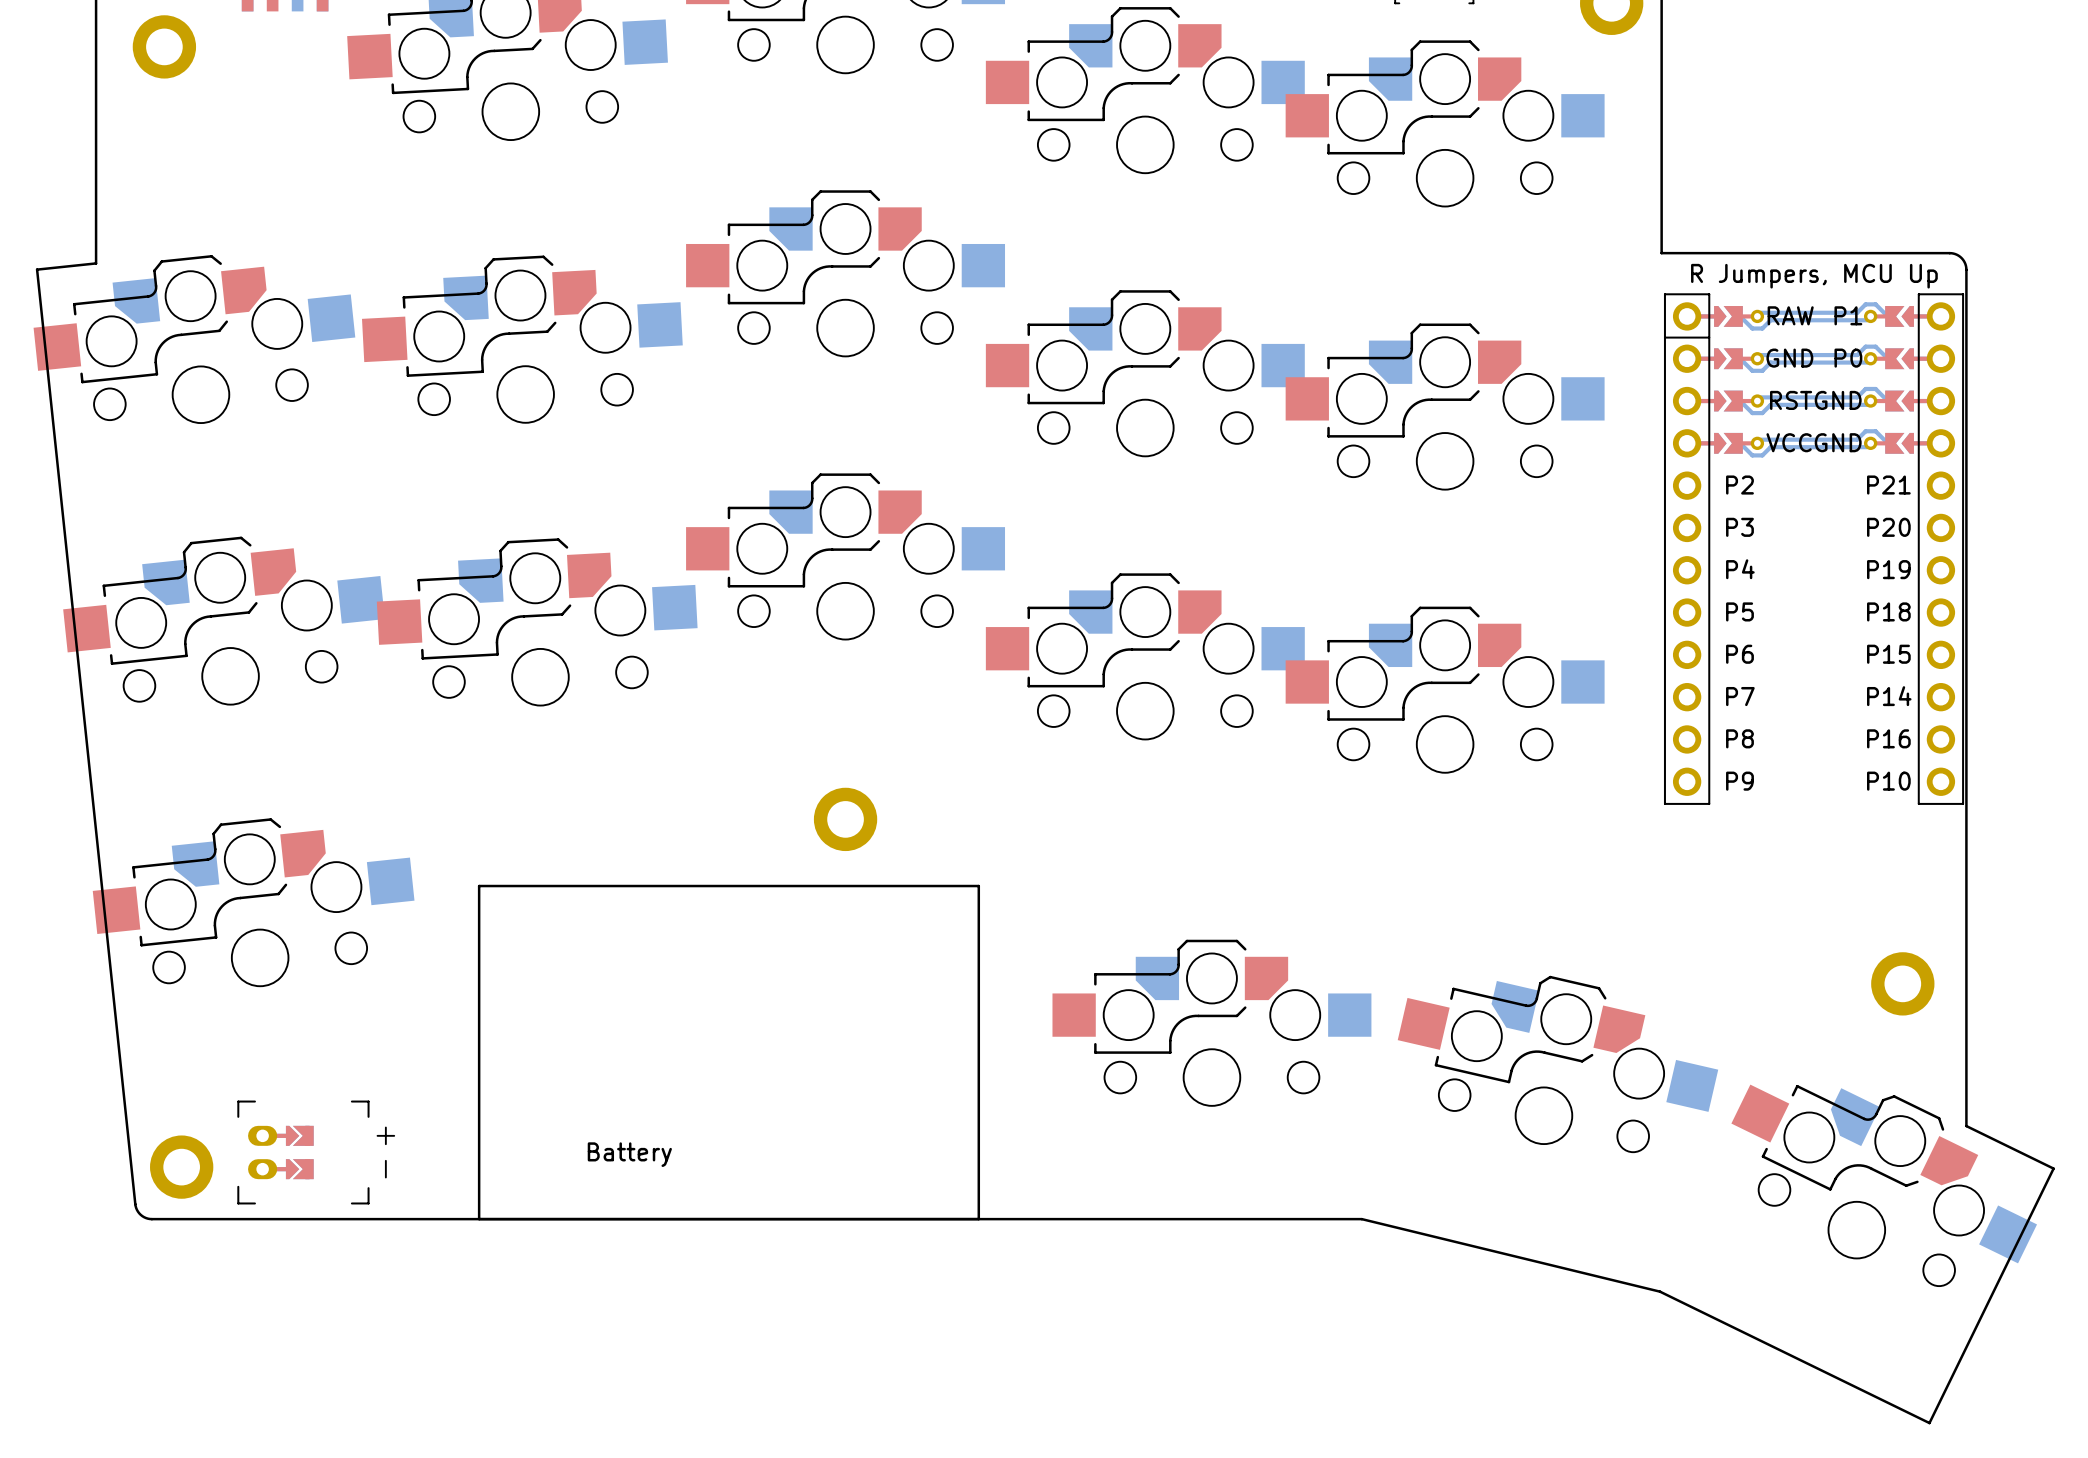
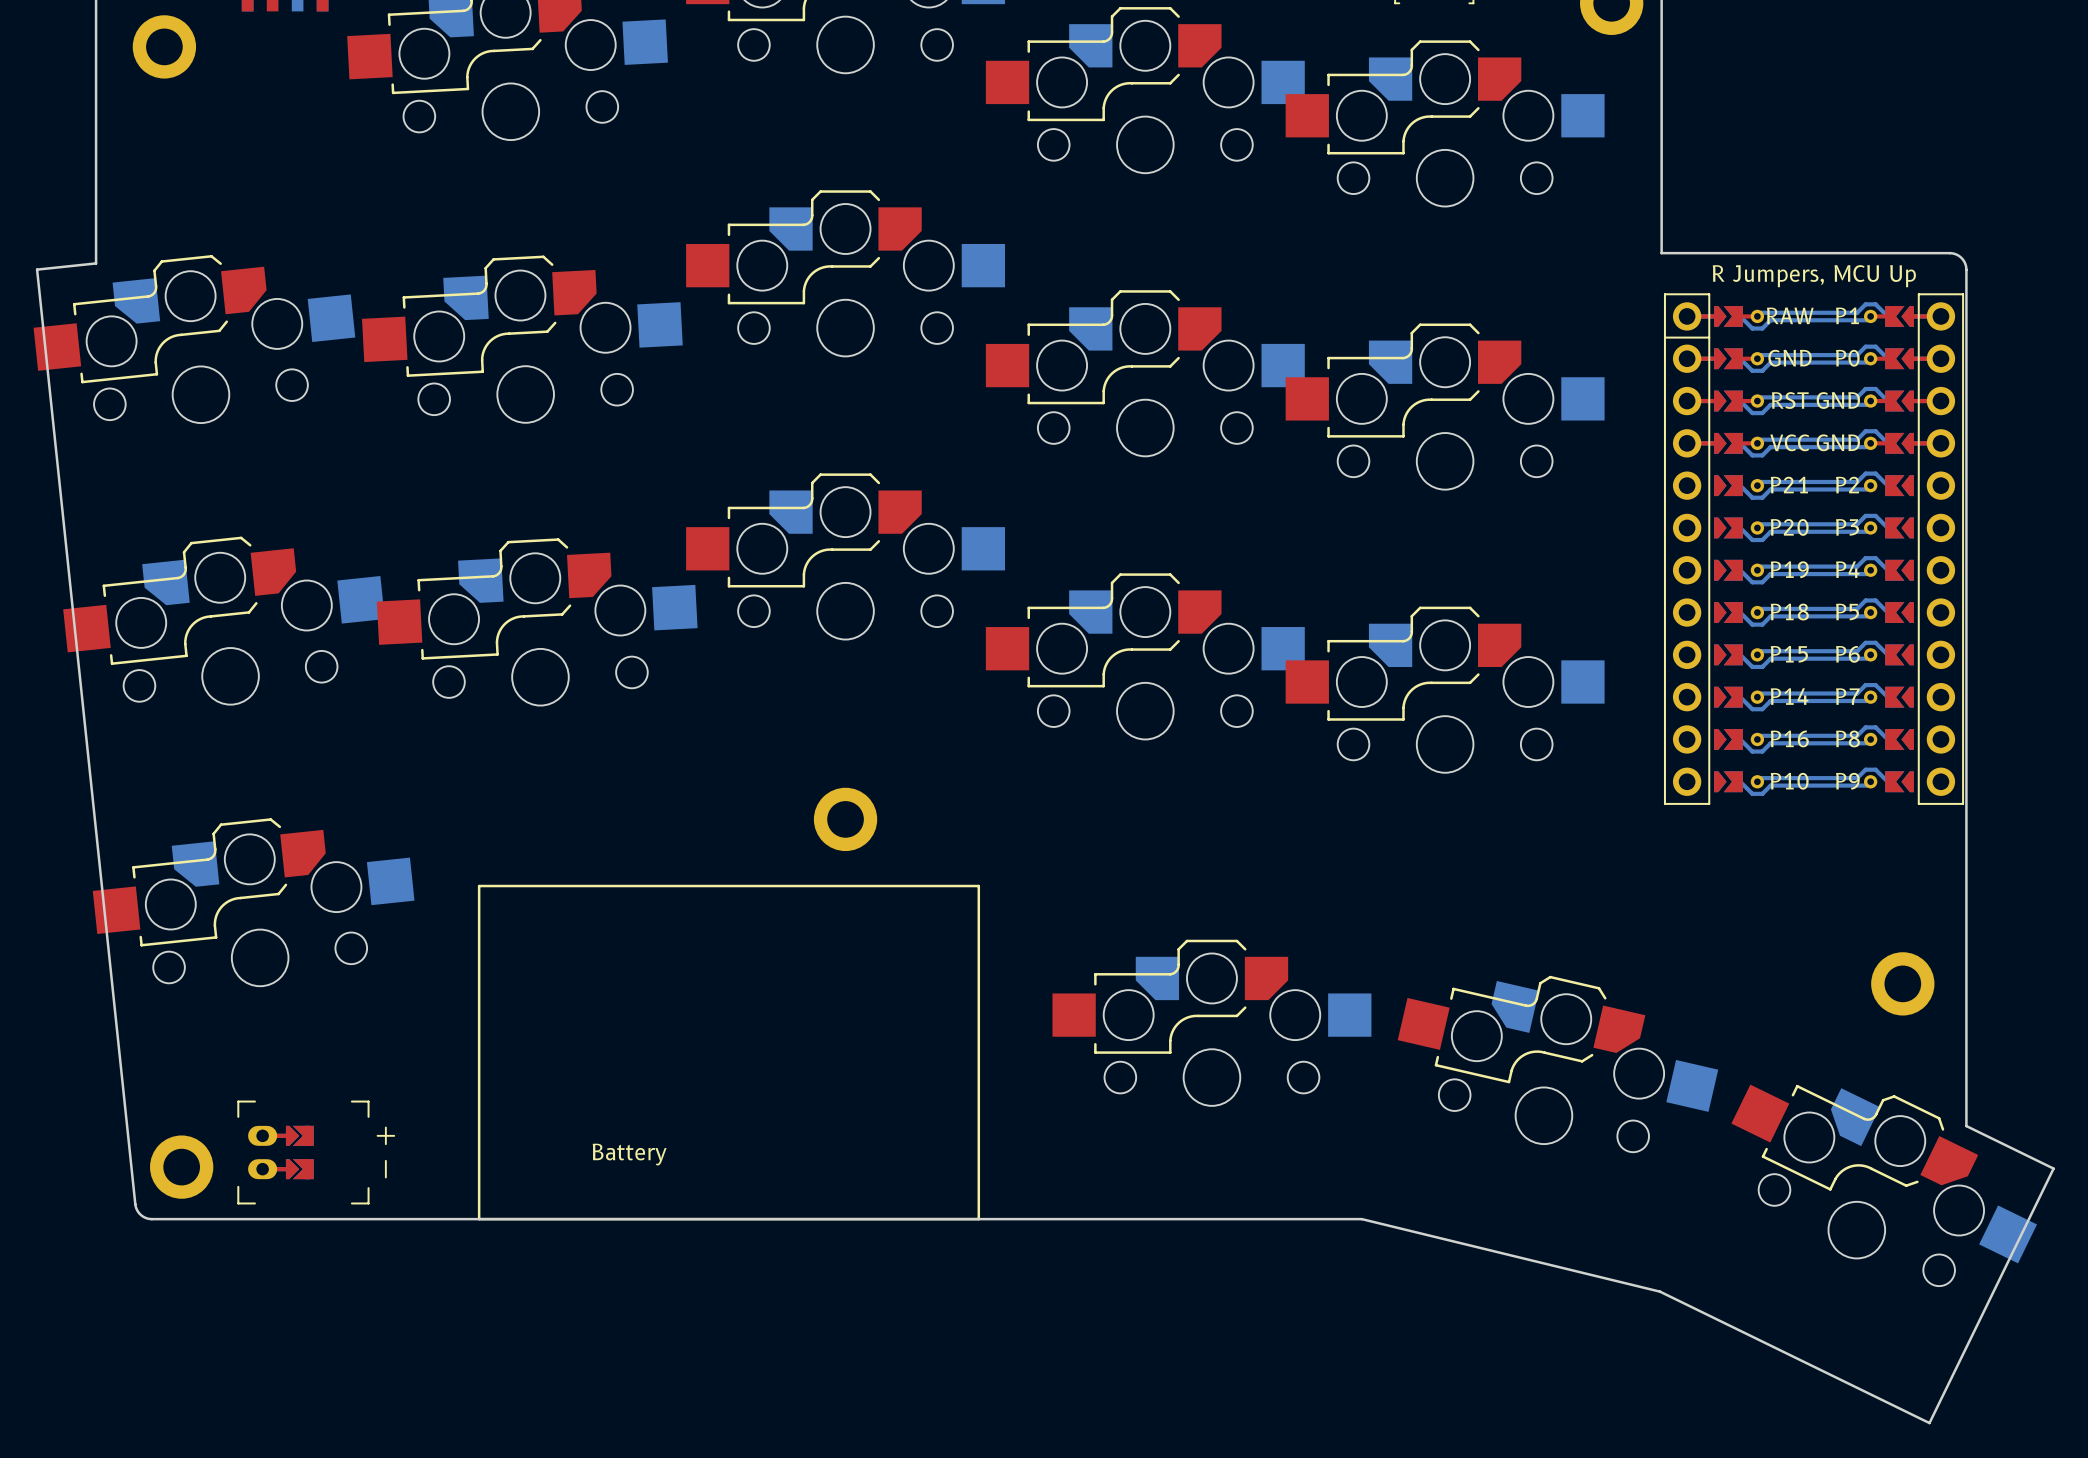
part footprint: [1663, 293, 1965, 805] -> [1663, 293, 1965, 805]
bottom track: none -> (1761, 481) (1857, 481) (1865, 473) (1875, 473) (1887, 485) (1893, 485)
bottom track: none -> (1734, 485) (1740, 485) (1752, 497) (1762, 497) (1770, 489) (1866, 489)
bottom track: none -> (1761, 524) (1857, 524) (1865, 515) (1875, 515) (1887, 527) (1893, 527)
bottom track: none -> (1734, 527) (1740, 527) (1752, 540) (1762, 540) (1770, 531) (1866, 531)
bottom track: none -> (1761, 566) (1857, 566) (1865, 558) (1875, 558) (1887, 570) (1893, 570)
bottom track: none -> (1734, 570) (1740, 570) (1752, 582) (1762, 582) (1770, 574) (1866, 574)
bottom track: none -> (1761, 608) (1857, 608) (1865, 600) (1875, 600) (1887, 612) (1893, 612)
bottom track: none -> (1734, 612) (1740, 612) (1752, 624) (1762, 624) (1770, 616) (1866, 616)
bottom track: none -> (1761, 651) (1857, 651) (1865, 642) (1875, 642) (1887, 654) (1893, 654)
bottom track: none -> (1734, 654) (1740, 654) (1752, 666) (1762, 666) (1770, 658) (1866, 658)
bottom track: none -> (1761, 693) (1857, 693) (1865, 685) (1875, 685) (1887, 697) (1893, 697)
bottom track: none -> (1734, 697) (1740, 697) (1752, 709) (1762, 709) (1770, 700) (1866, 700)
bottom track: none -> (1761, 735) (1857, 735) (1865, 727) (1875, 727) (1887, 739) (1893, 739)
bottom track: none -> (1734, 739) (1740, 739) (1752, 751) (1762, 751) (1770, 743) (1866, 743)
bottom track: none -> (1761, 778) (1857, 778) (1865, 769) (1875, 769) (1887, 781) (1893, 781)
bottom track: none -> (1734, 781) (1740, 781) (1752, 793) (1762, 793) (1770, 785) (1866, 785)

